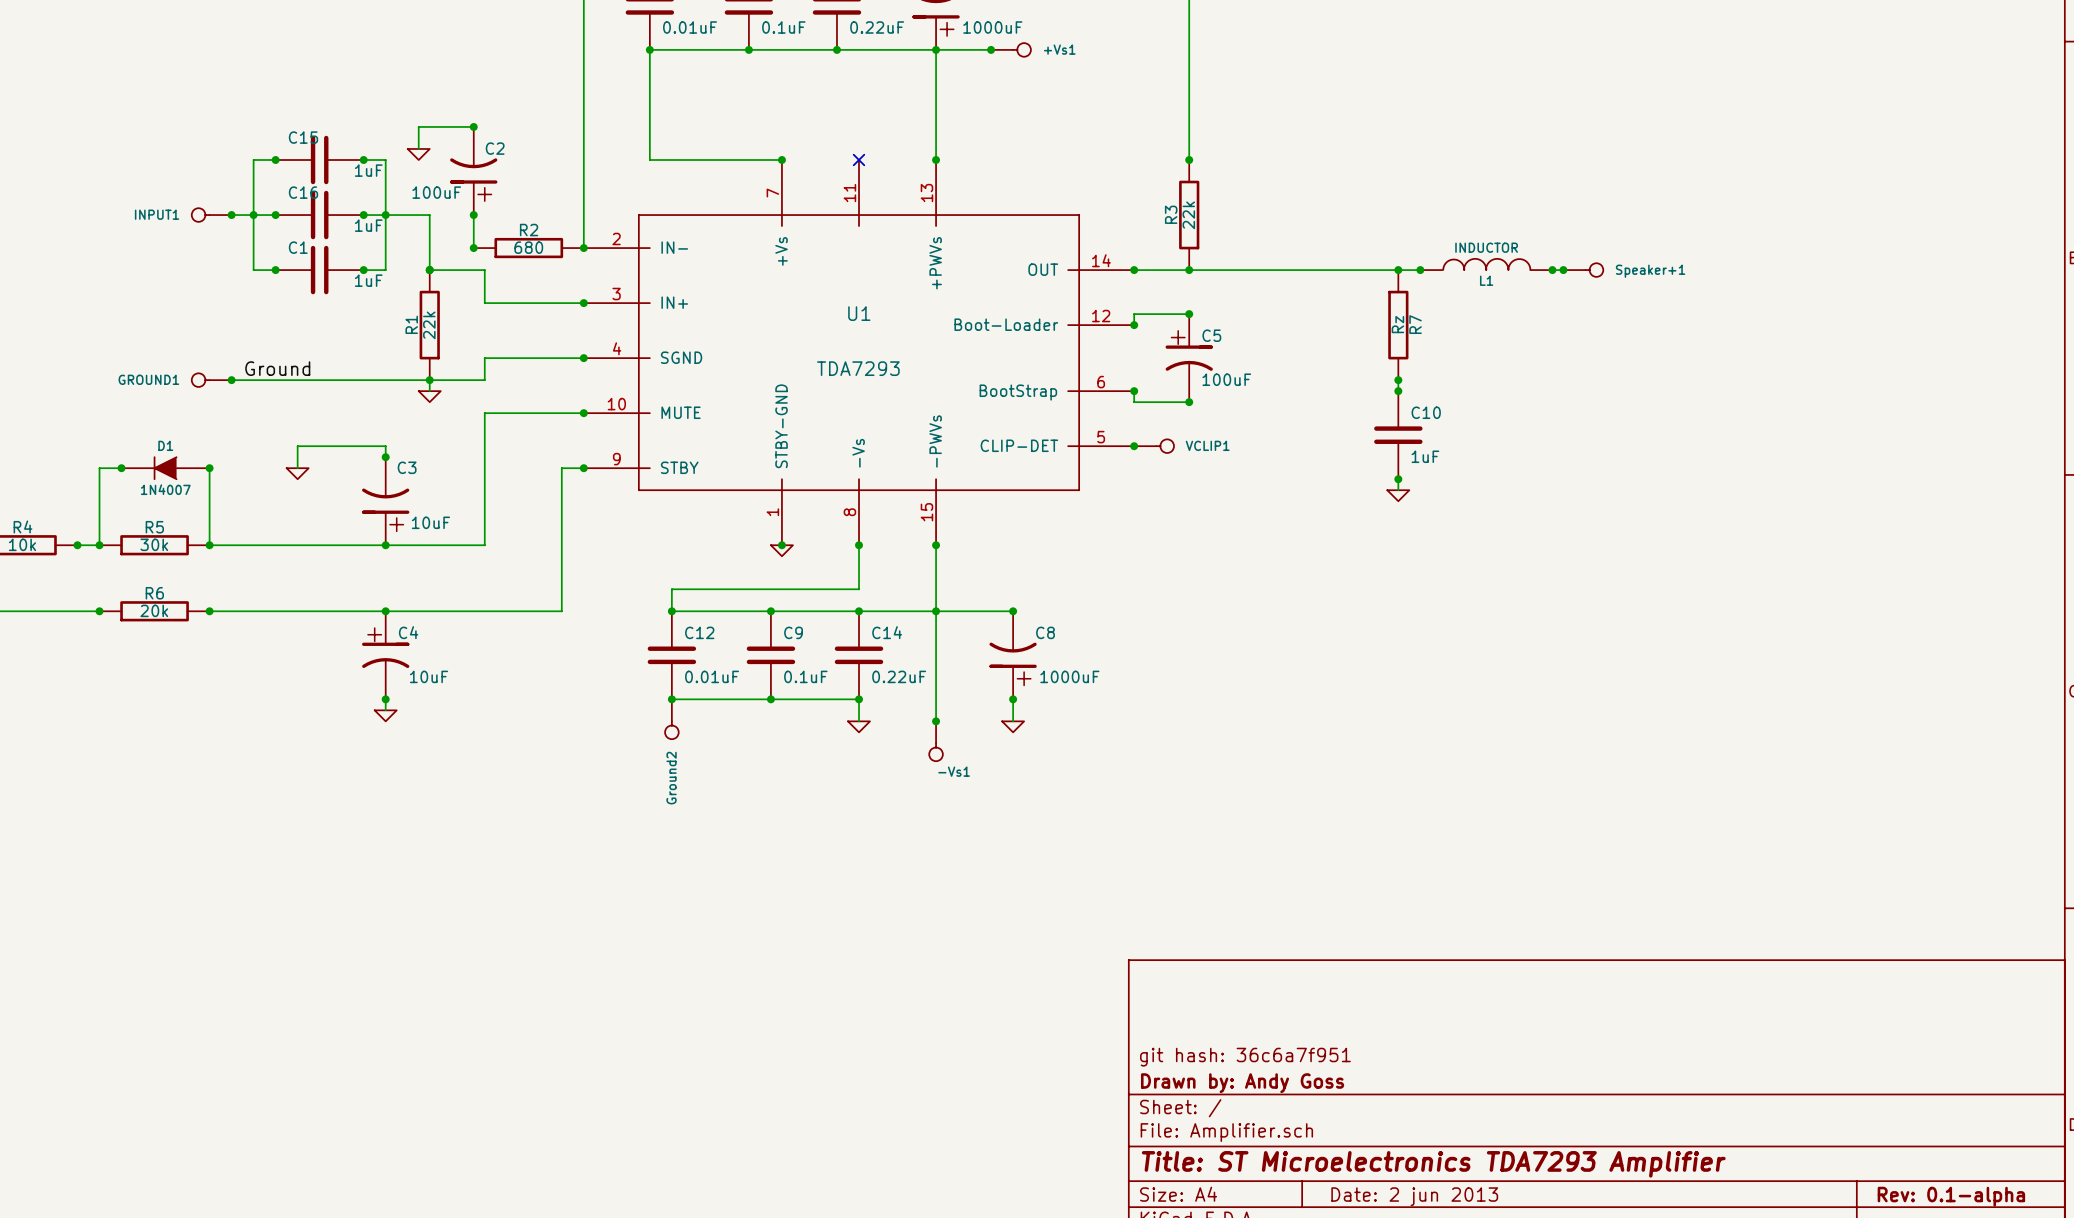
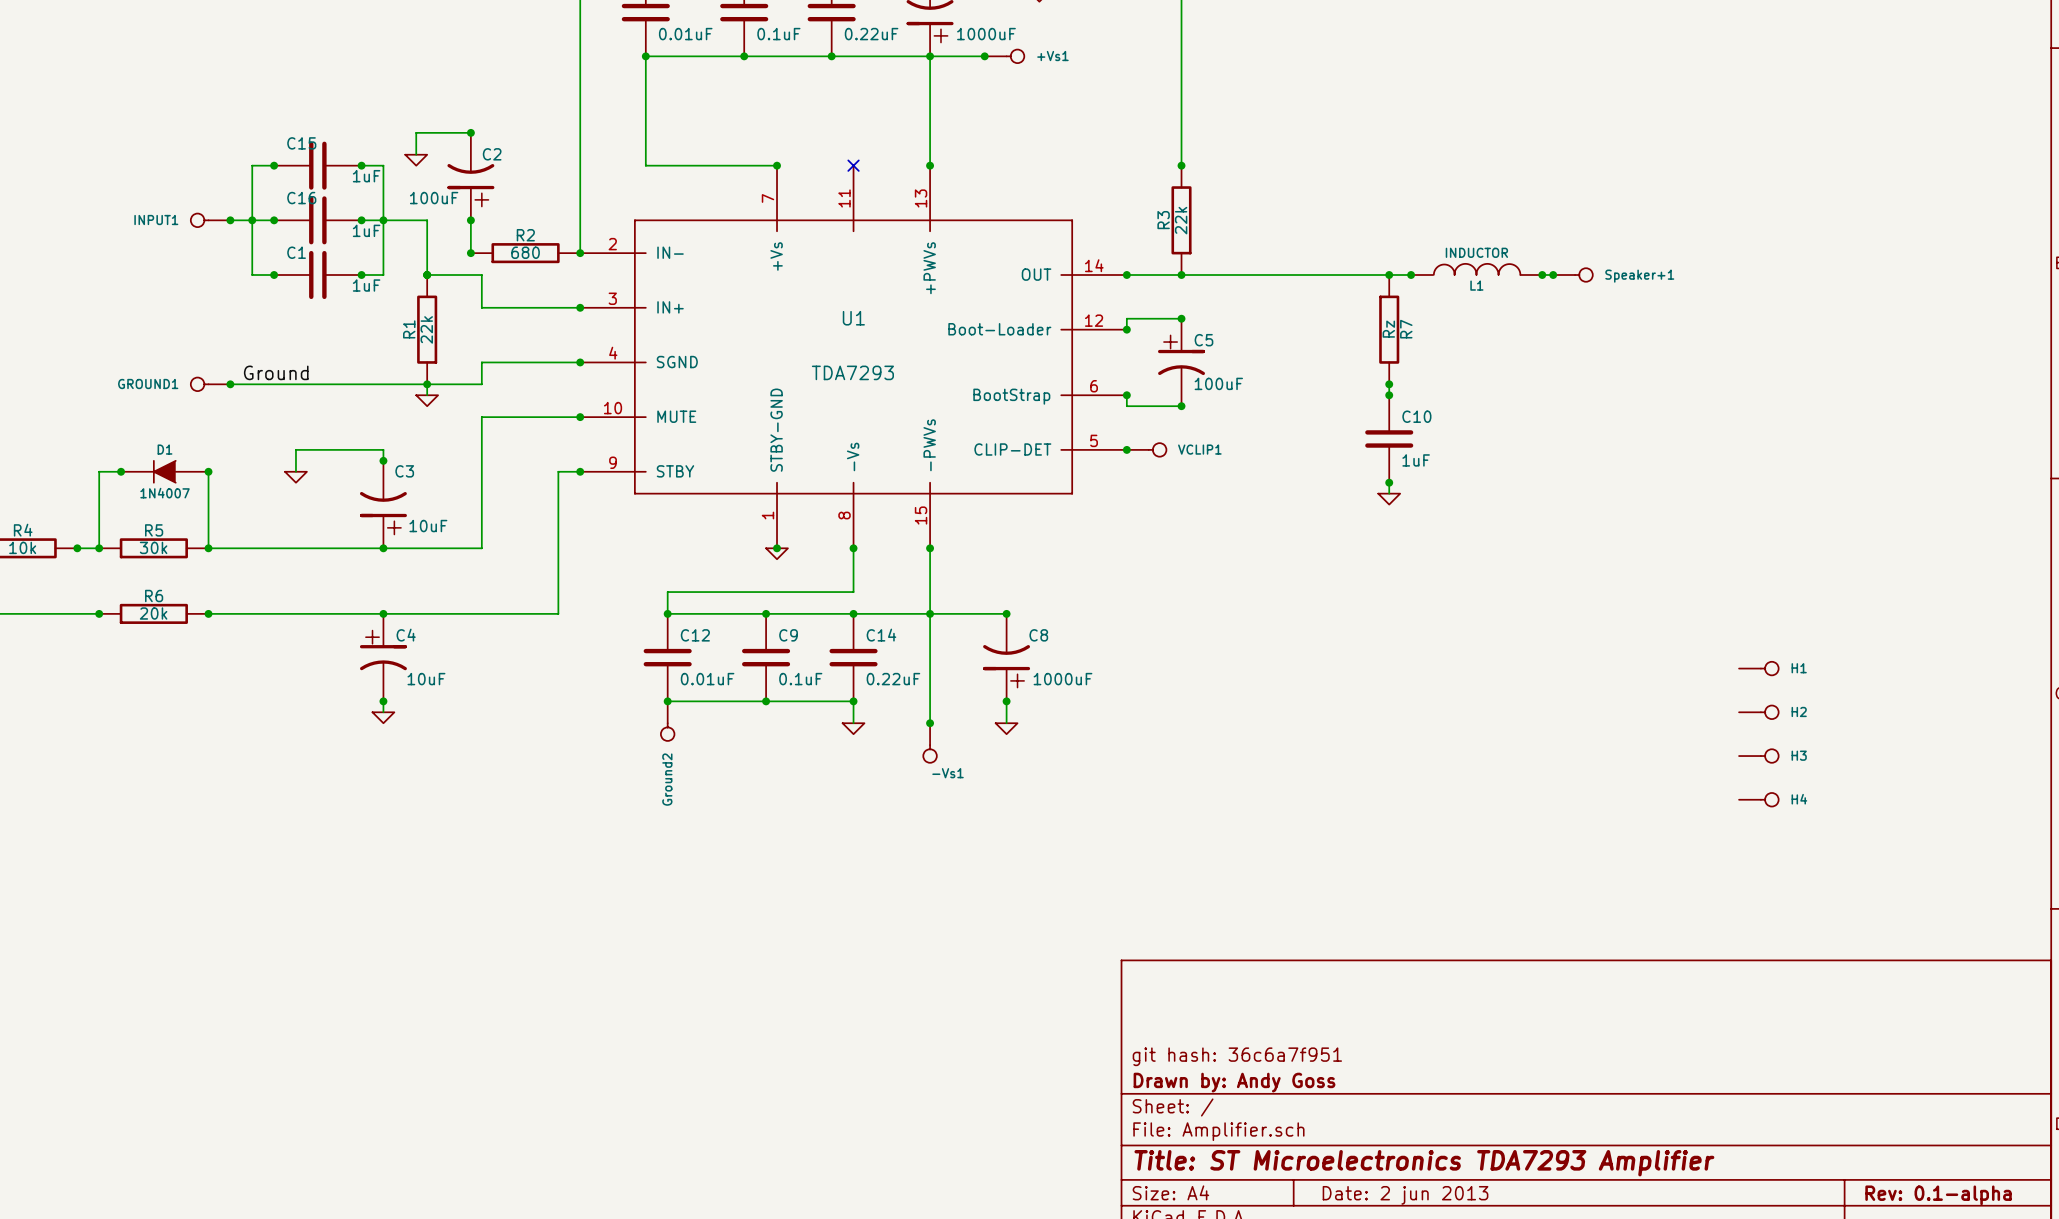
H1: none -> (1758, 668)
H2: none -> (1758, 712)
H3: none -> (1758, 756)
H4: none -> (1758, 799)

